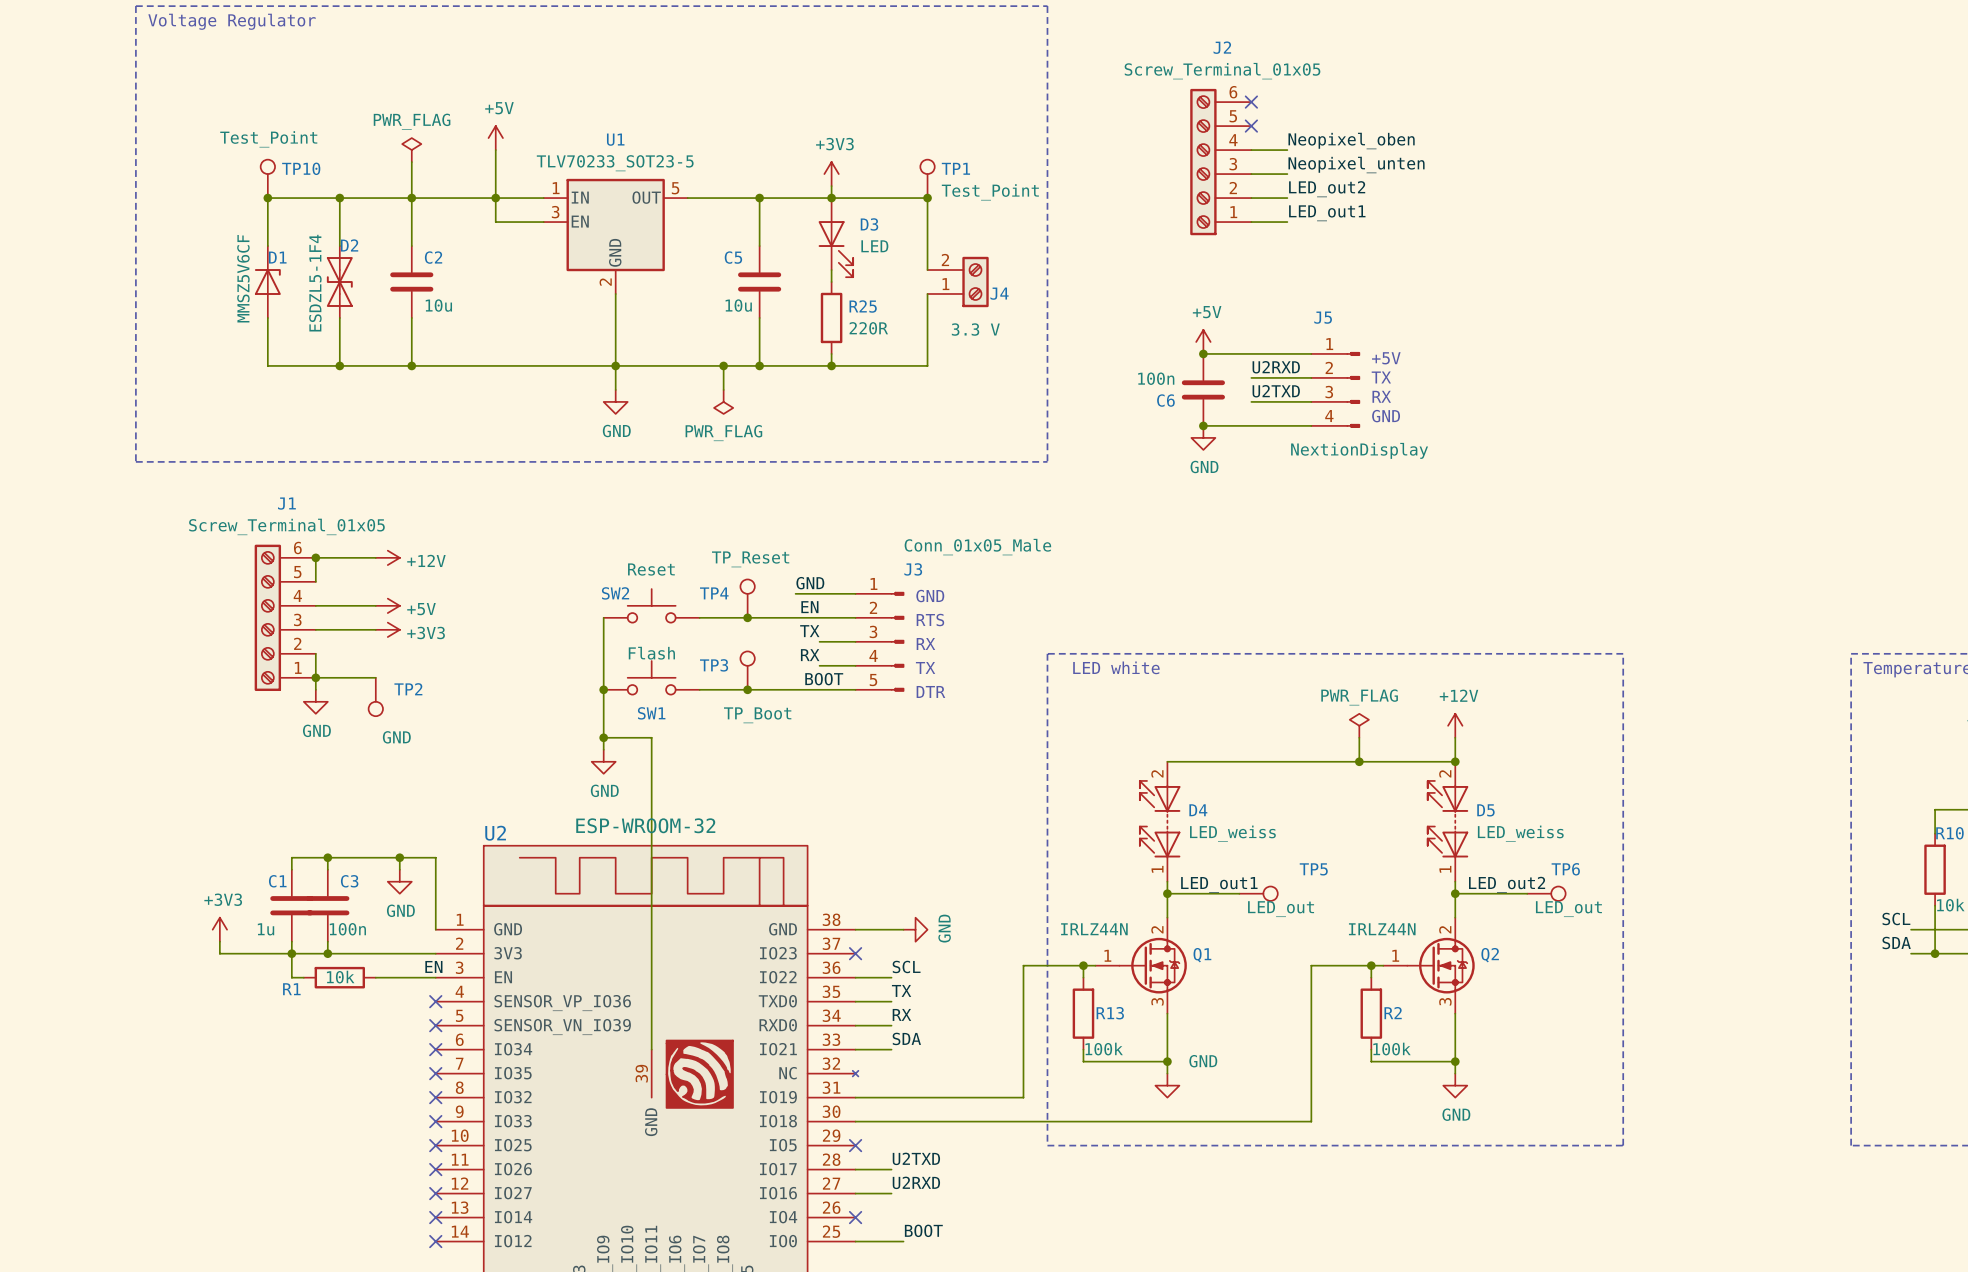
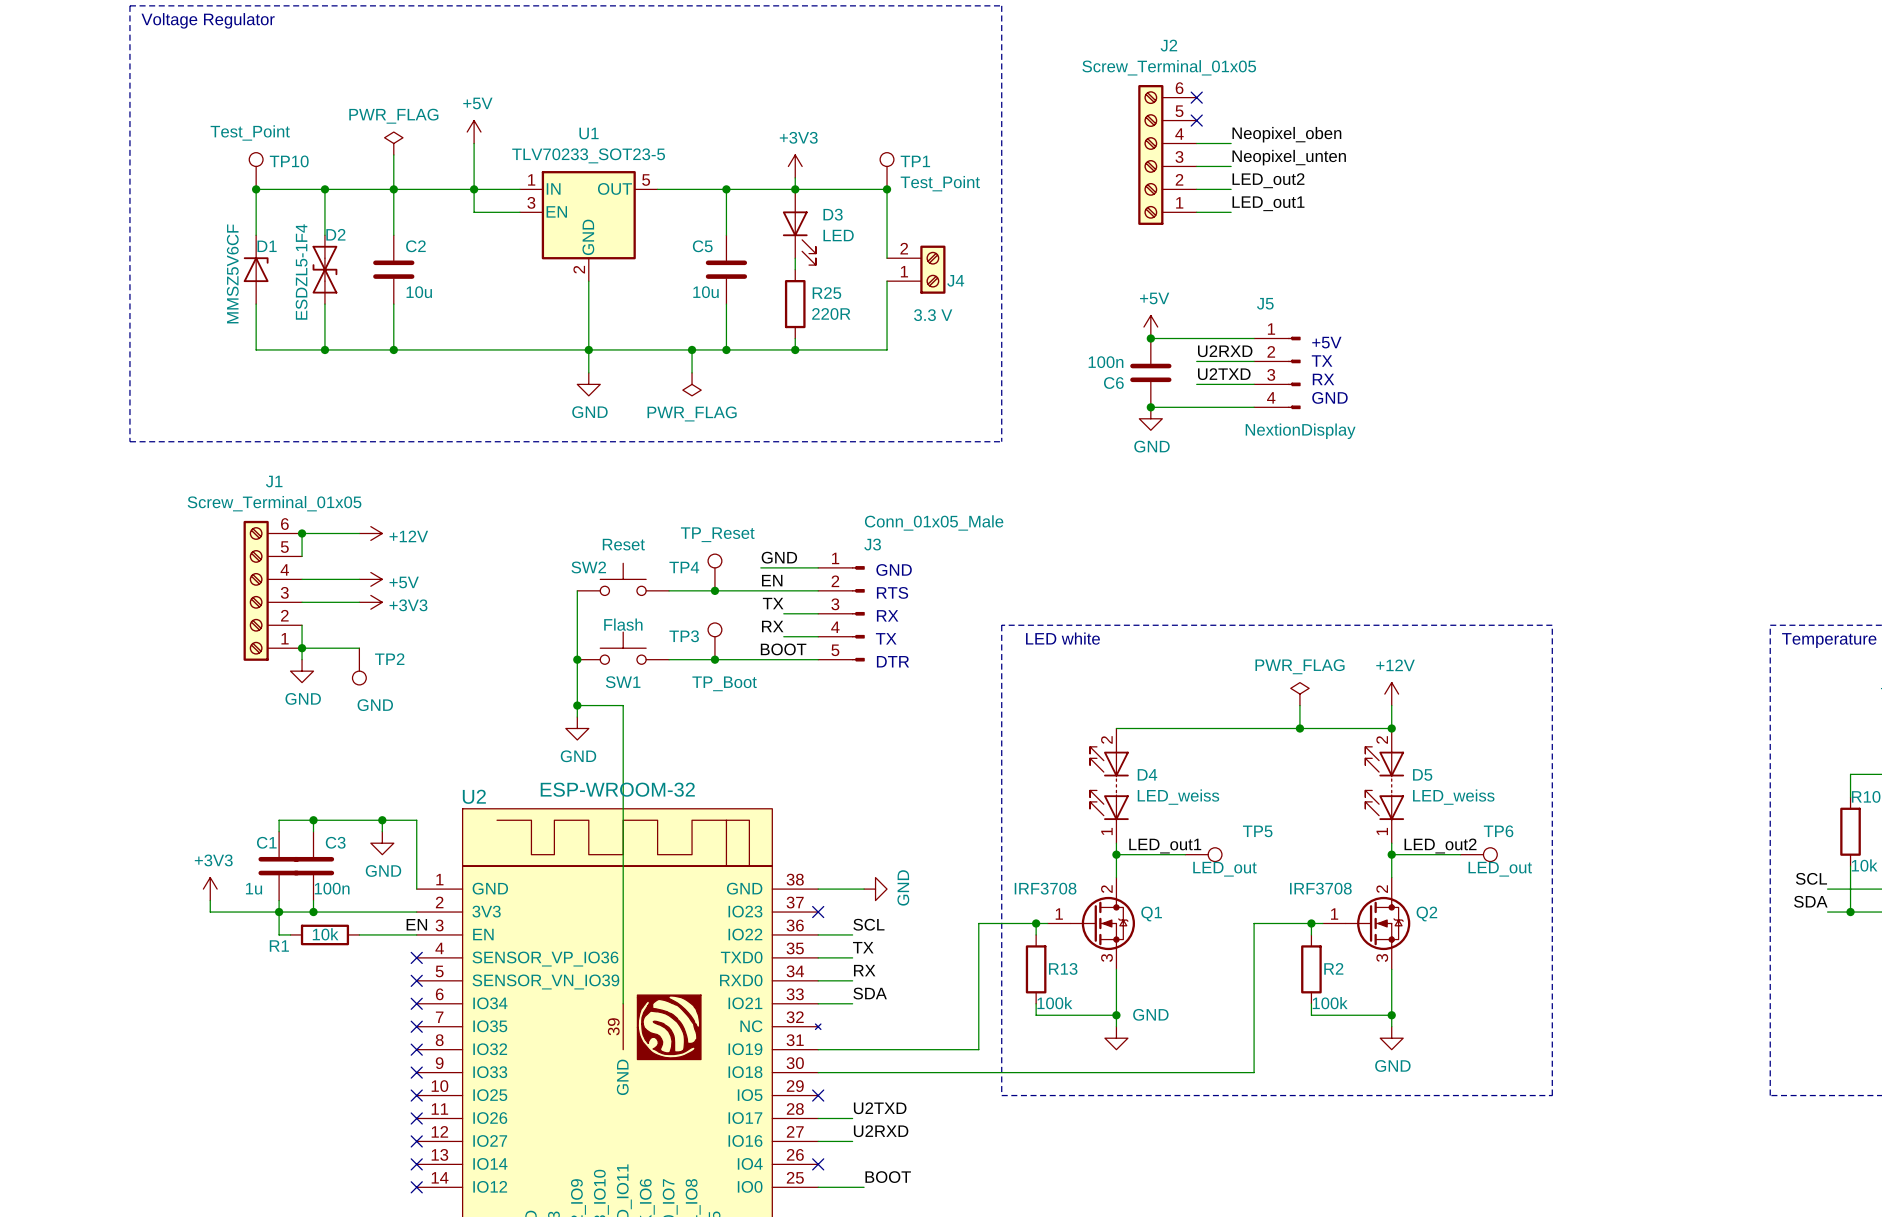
Q1 value: IRLZ44N (1094, 929) -> IRF3708 (1045, 888)
Q2 value: IRLZ44N (1382, 929) -> IRF3708 (1320, 888)

